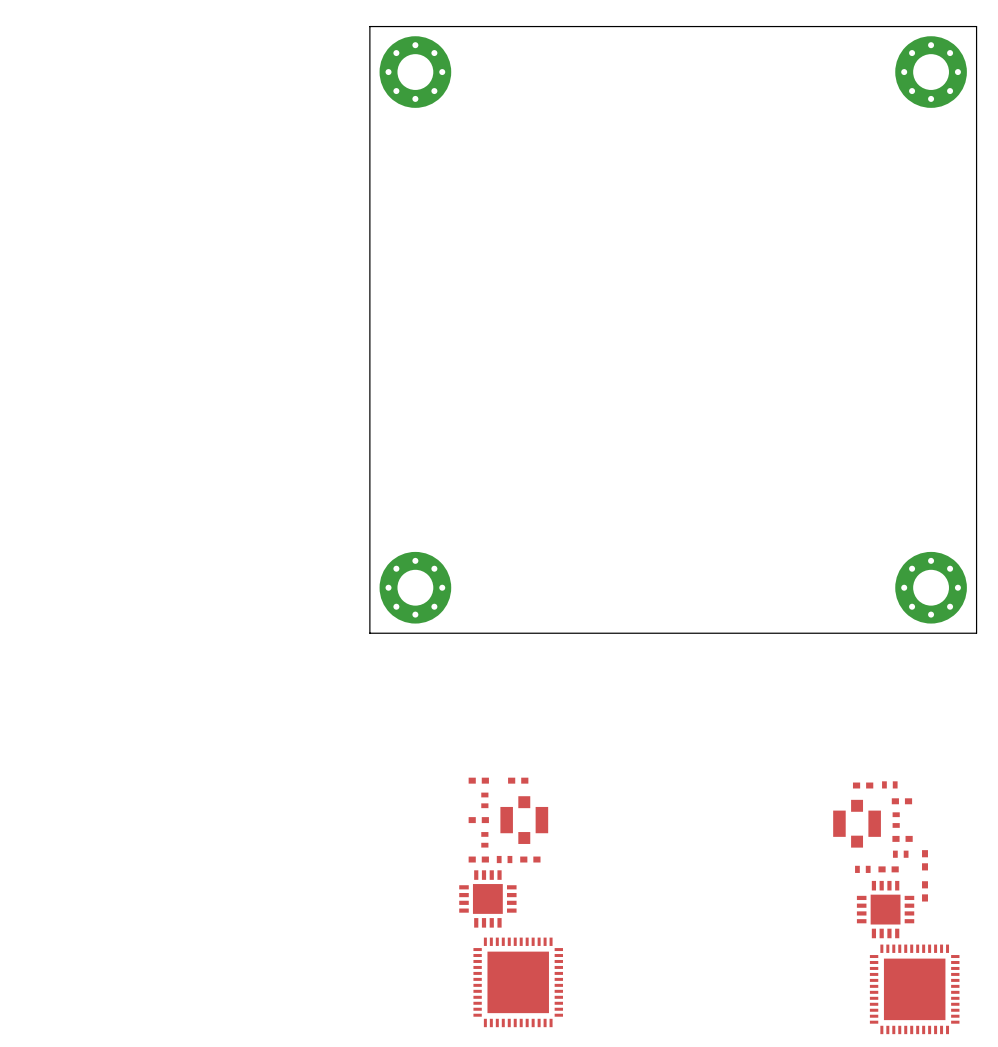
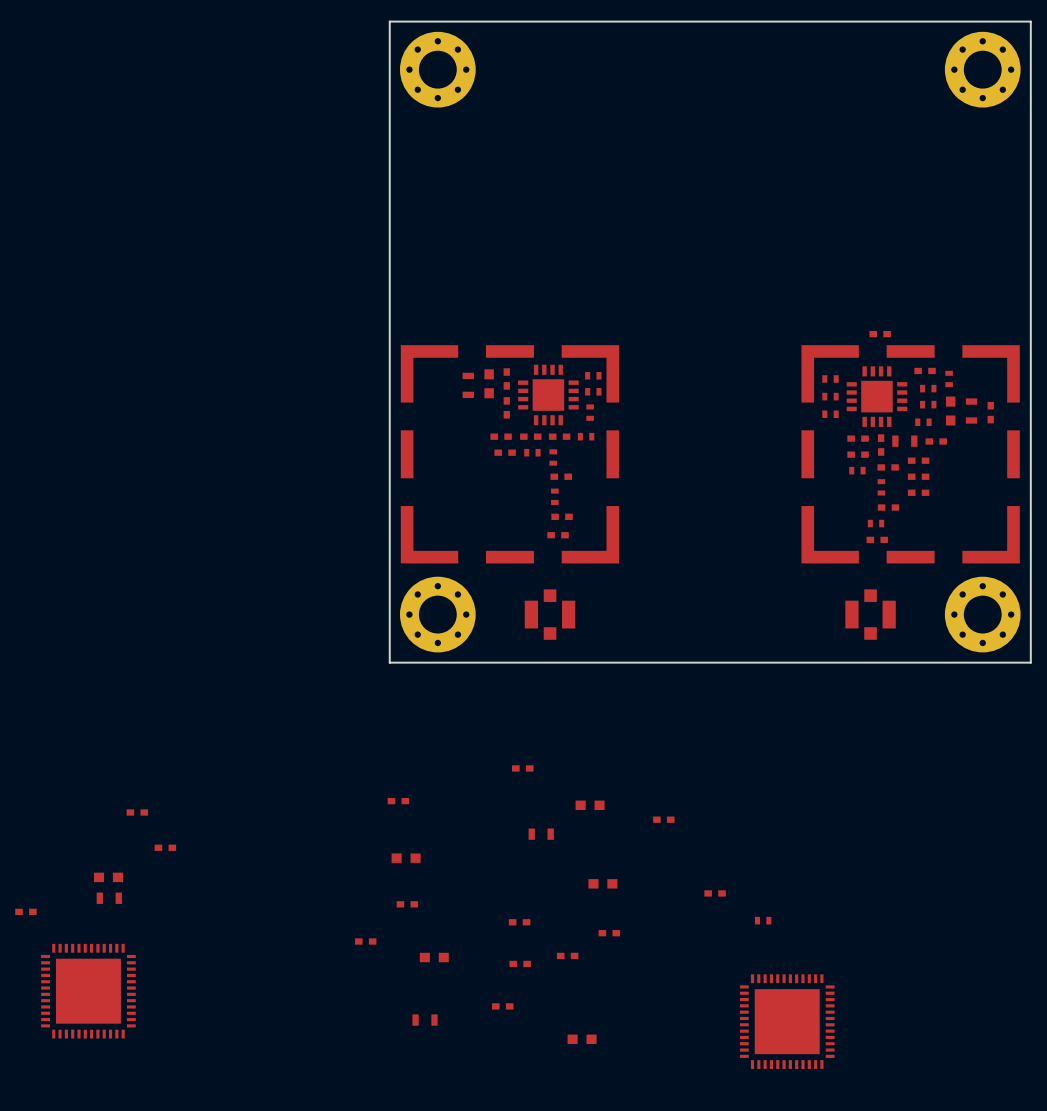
part: none -> (880, 334)
part: none -> (925, 370)
part: none -> (593, 375)
part: none -> (506, 378)
part: none -> (830, 378)
part: none -> (949, 378)
part: none -> (489, 383)
part: none -> (468, 385)
part: none -> (928, 388)
part: none -> (593, 391)
part: none -> (548, 395)
part: none -> (830, 396)
part: none -> (876, 396)
part: none -> (928, 404)
part: none -> (506, 407)
part: none -> (950, 411)
part: none -> (971, 411)
part: none -> (590, 412)
part: none -> (990, 412)
part: none -> (830, 414)
part: none -> (923, 422)
part: none -> (501, 436)
part: none -> (530, 436)
part: none -> (559, 436)
part: none -> (586, 436)
part: none -> (858, 438)
part: none -> (904, 441)
part: none -> (936, 441)
part: none -> (881, 445)
part: none -> (505, 452)
part: none -> (532, 452)
part: none -> (509, 454)
part: none -> (858, 454)
part: none -> (910, 454)
part: none -> (553, 457)
part: none -> (918, 460)
part: none -> (888, 467)
part: none -> (857, 470)
part: none -> (561, 476)
part: none -> (918, 476)
part: none -> (881, 487)
part: none -> (918, 492)
part: none -> (554, 496)
part: none -> (888, 507)
part: none -> (562, 516)
part: none -> (876, 523)
part: none -> (558, 535)
part: none -> (877, 539)
part: none -> (550, 614)
part: none -> (870, 614)
part: none -> (522, 768)
part: none -> (398, 801)
part: none -> (590, 805)
part: none -> (137, 812)
part: (478, 780) -> none
part: (518, 780) -> none
part: none -> (663, 819)
part: (889, 784) -> none
part: (863, 785) -> none
part: none -> (541, 834)
part: (484, 800) -> none
part: (901, 801) -> none
part: none -> (165, 847)
part: none -> (406, 858)
part: (478, 820) -> none
part: (524, 820) -> none
part: (896, 820) -> none
part: (857, 823) -> none
part: none -> (108, 877)
part: (902, 838) -> none
part: (484, 839) -> none
part: none -> (602, 883)
part: none -> (715, 893)
part: (900, 854) -> none
part: none -> (109, 898)
part: (478, 859) -> none
part: (504, 859) -> none
part: (530, 859) -> none
part: (925, 860) -> none
part: none -> (407, 904)
part: none -> (25, 911)
part: (862, 869) -> none
part: (888, 869) -> none
part: none -> (763, 920)
part: none -> (519, 922)
part: none -> (609, 933)
part: (925, 891) -> none
part: none -> (365, 941)
part: (487, 898) -> none
part: (885, 909) -> none
part: none -> (567, 955)
part: none -> (434, 957)
part: none -> (520, 963)
part: none -> (88, 991)
part: none -> (502, 1006)
part: none -> (425, 1020)
part: none -> (787, 1021)
part: (518, 982) -> none
part: none -> (582, 1039)
part: (914, 989) -> none

